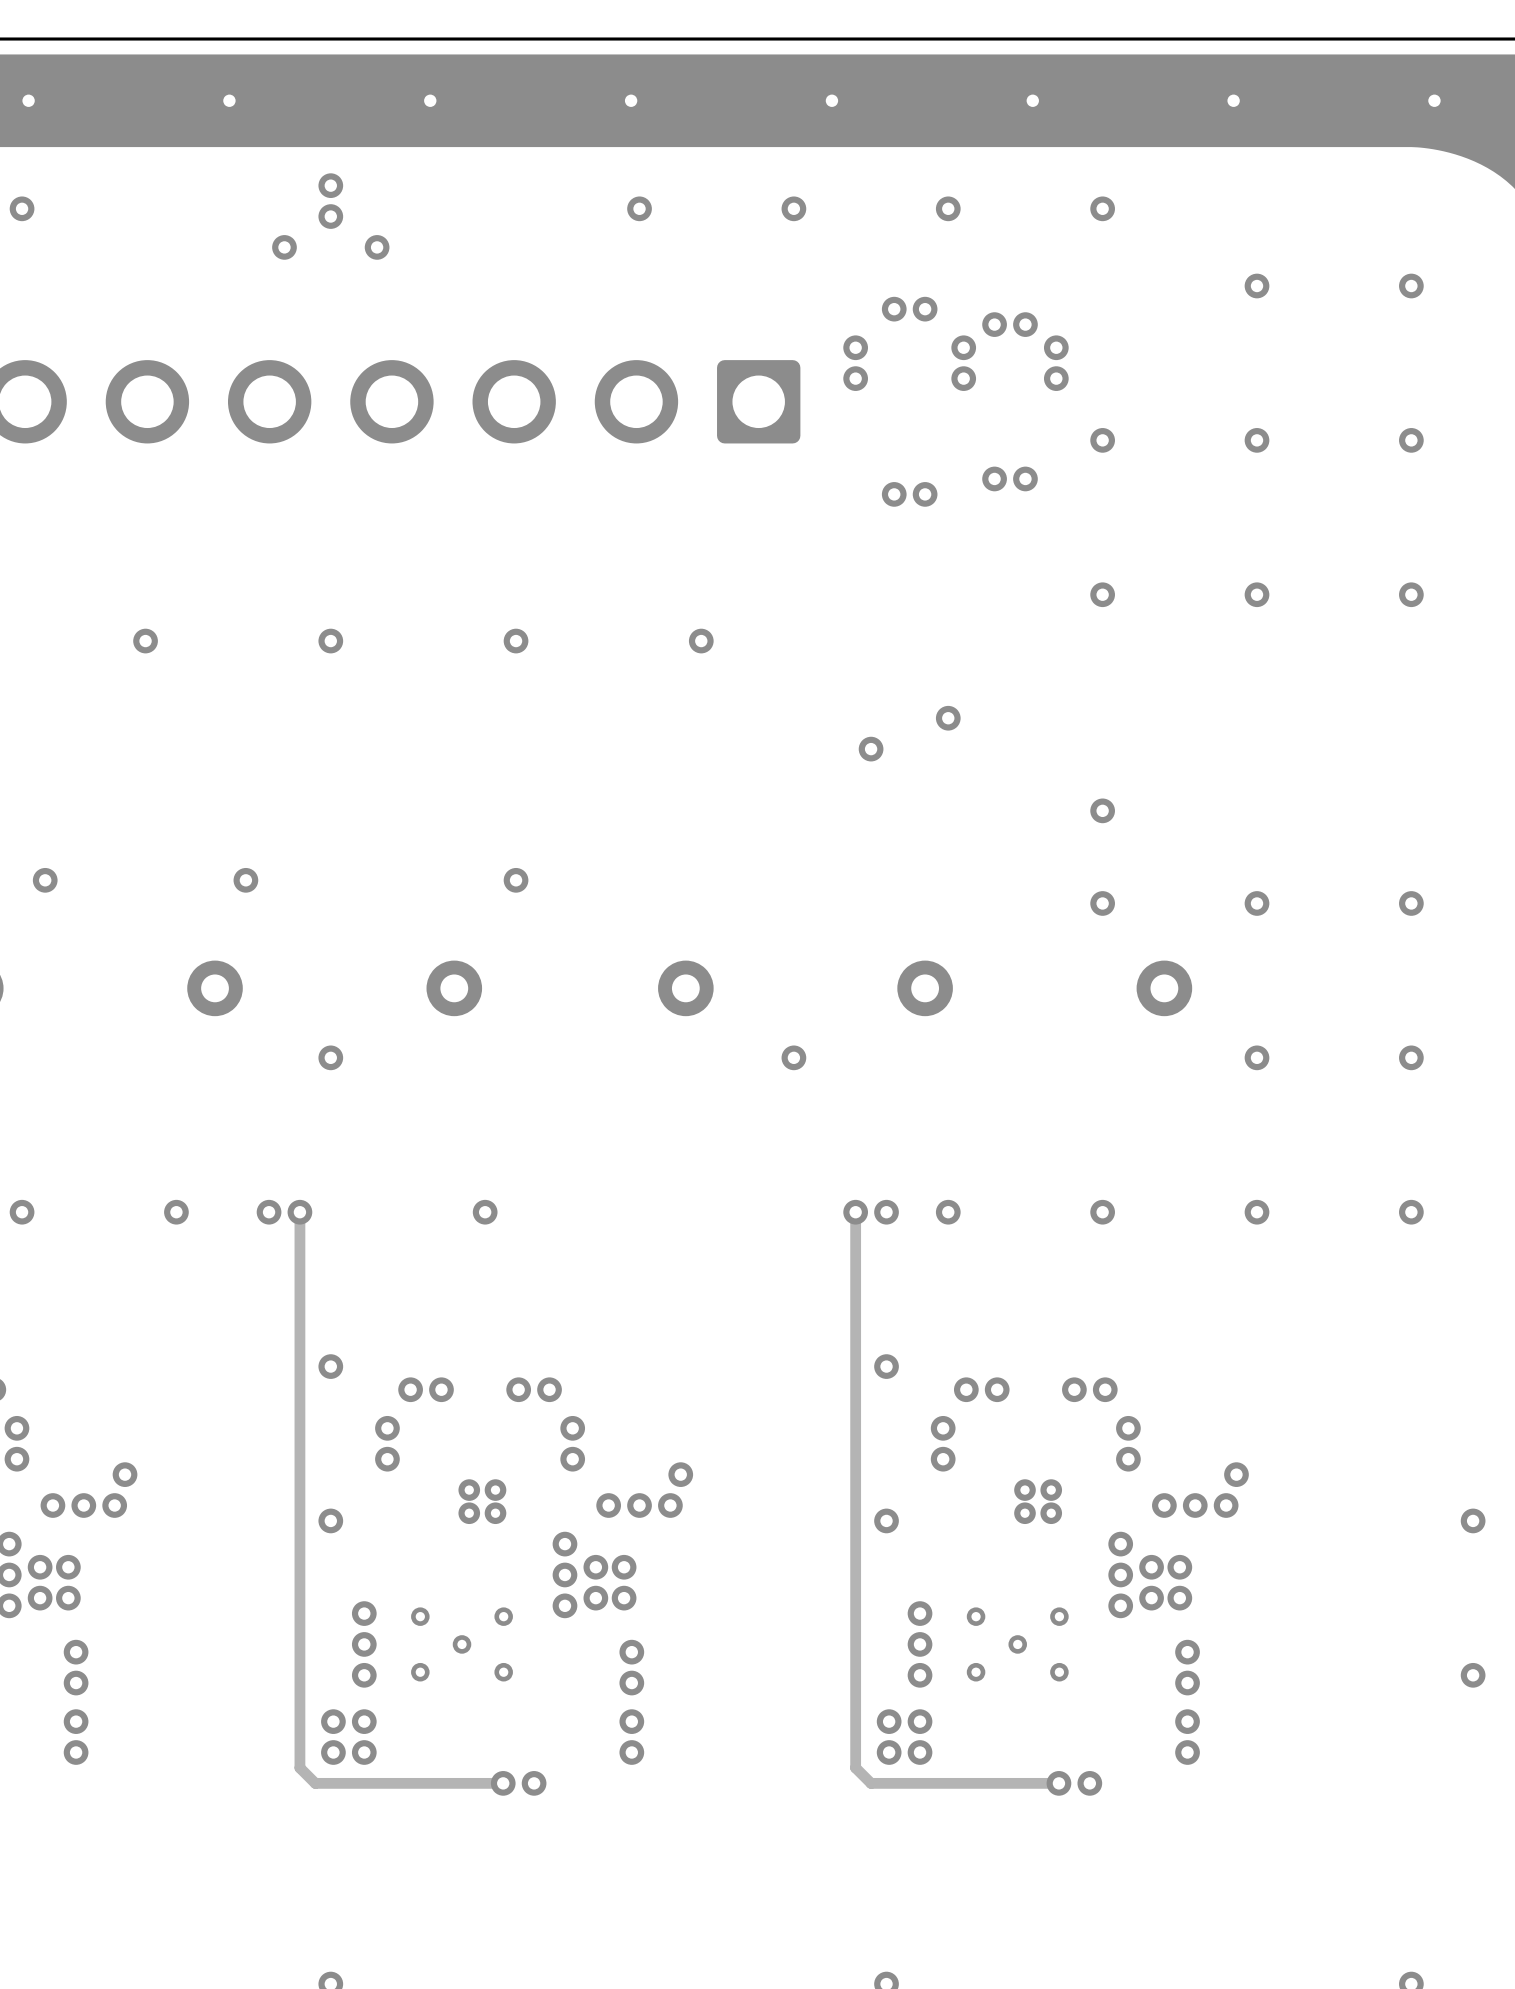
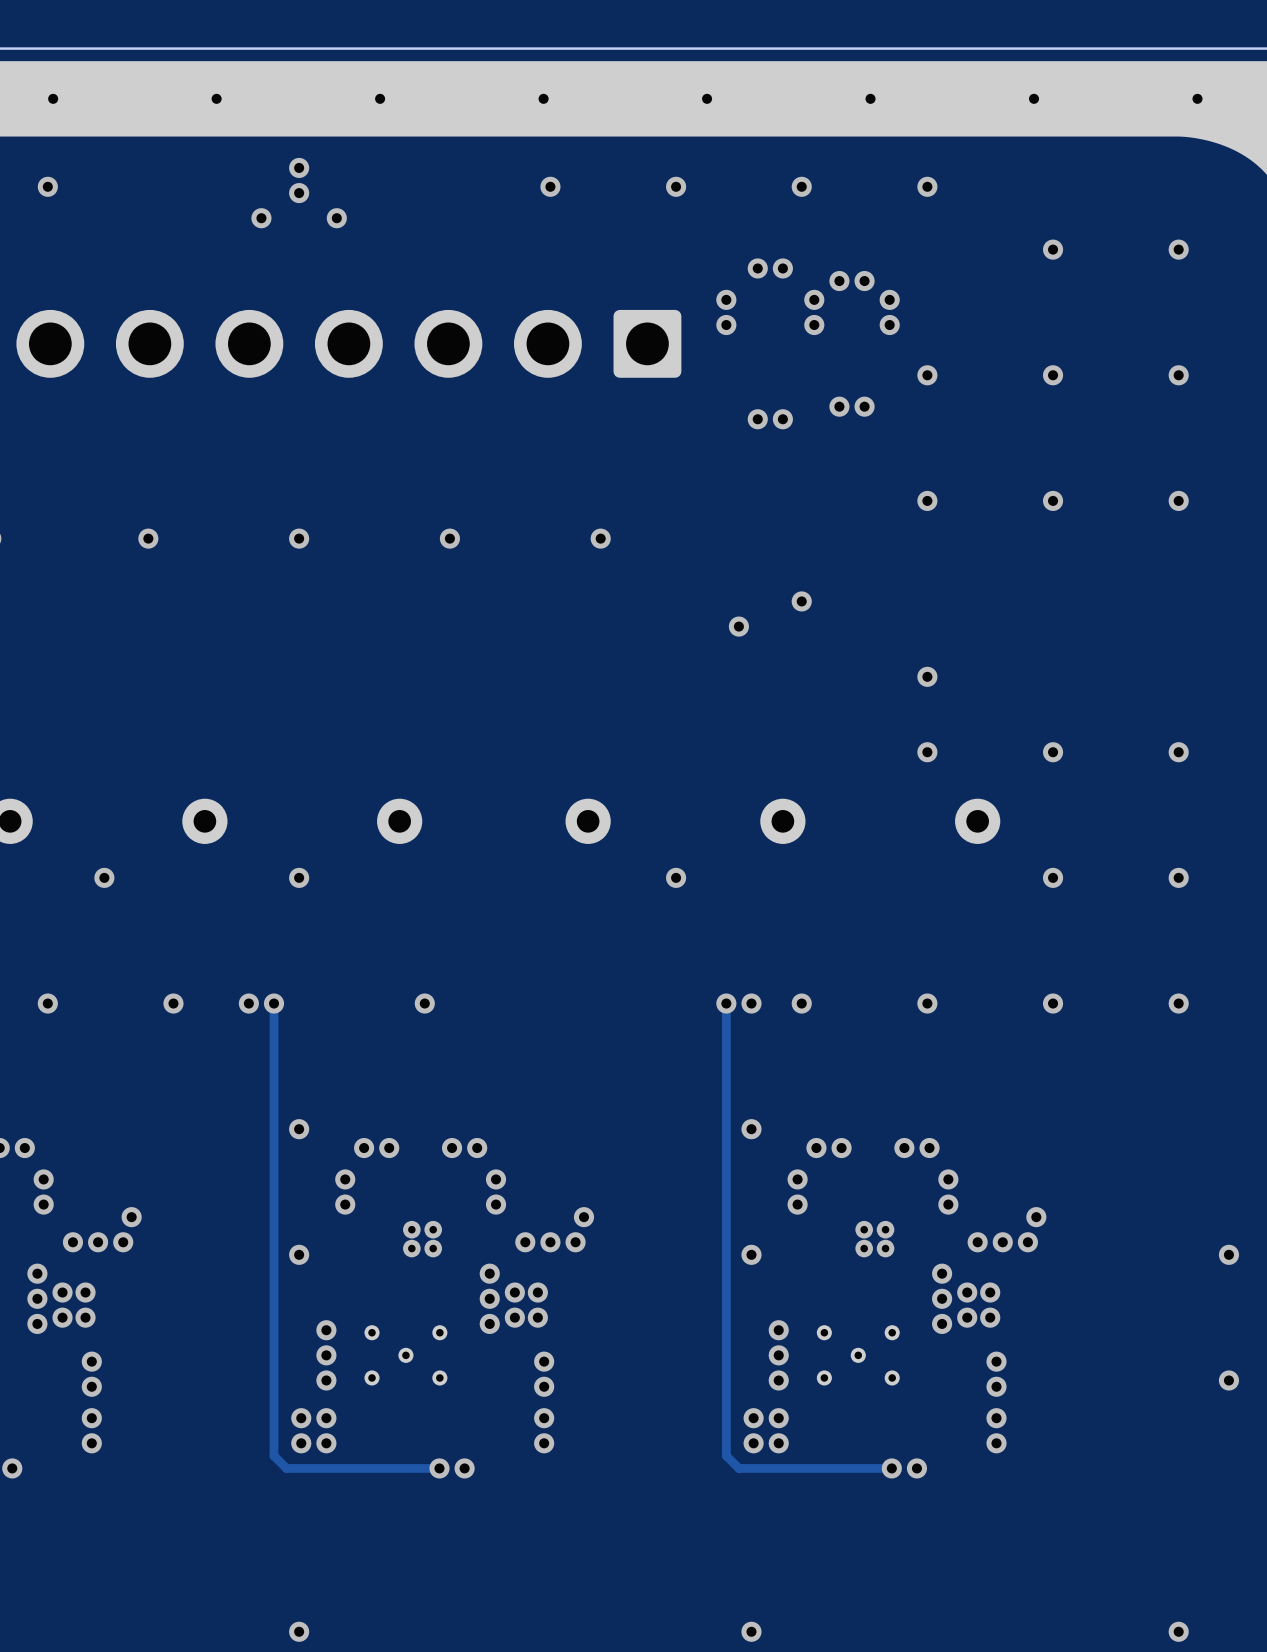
via: (45, 880) -> none
via: (245, 880) -> none
via: (516, 880) -> none
via: none -> (104, 877)

